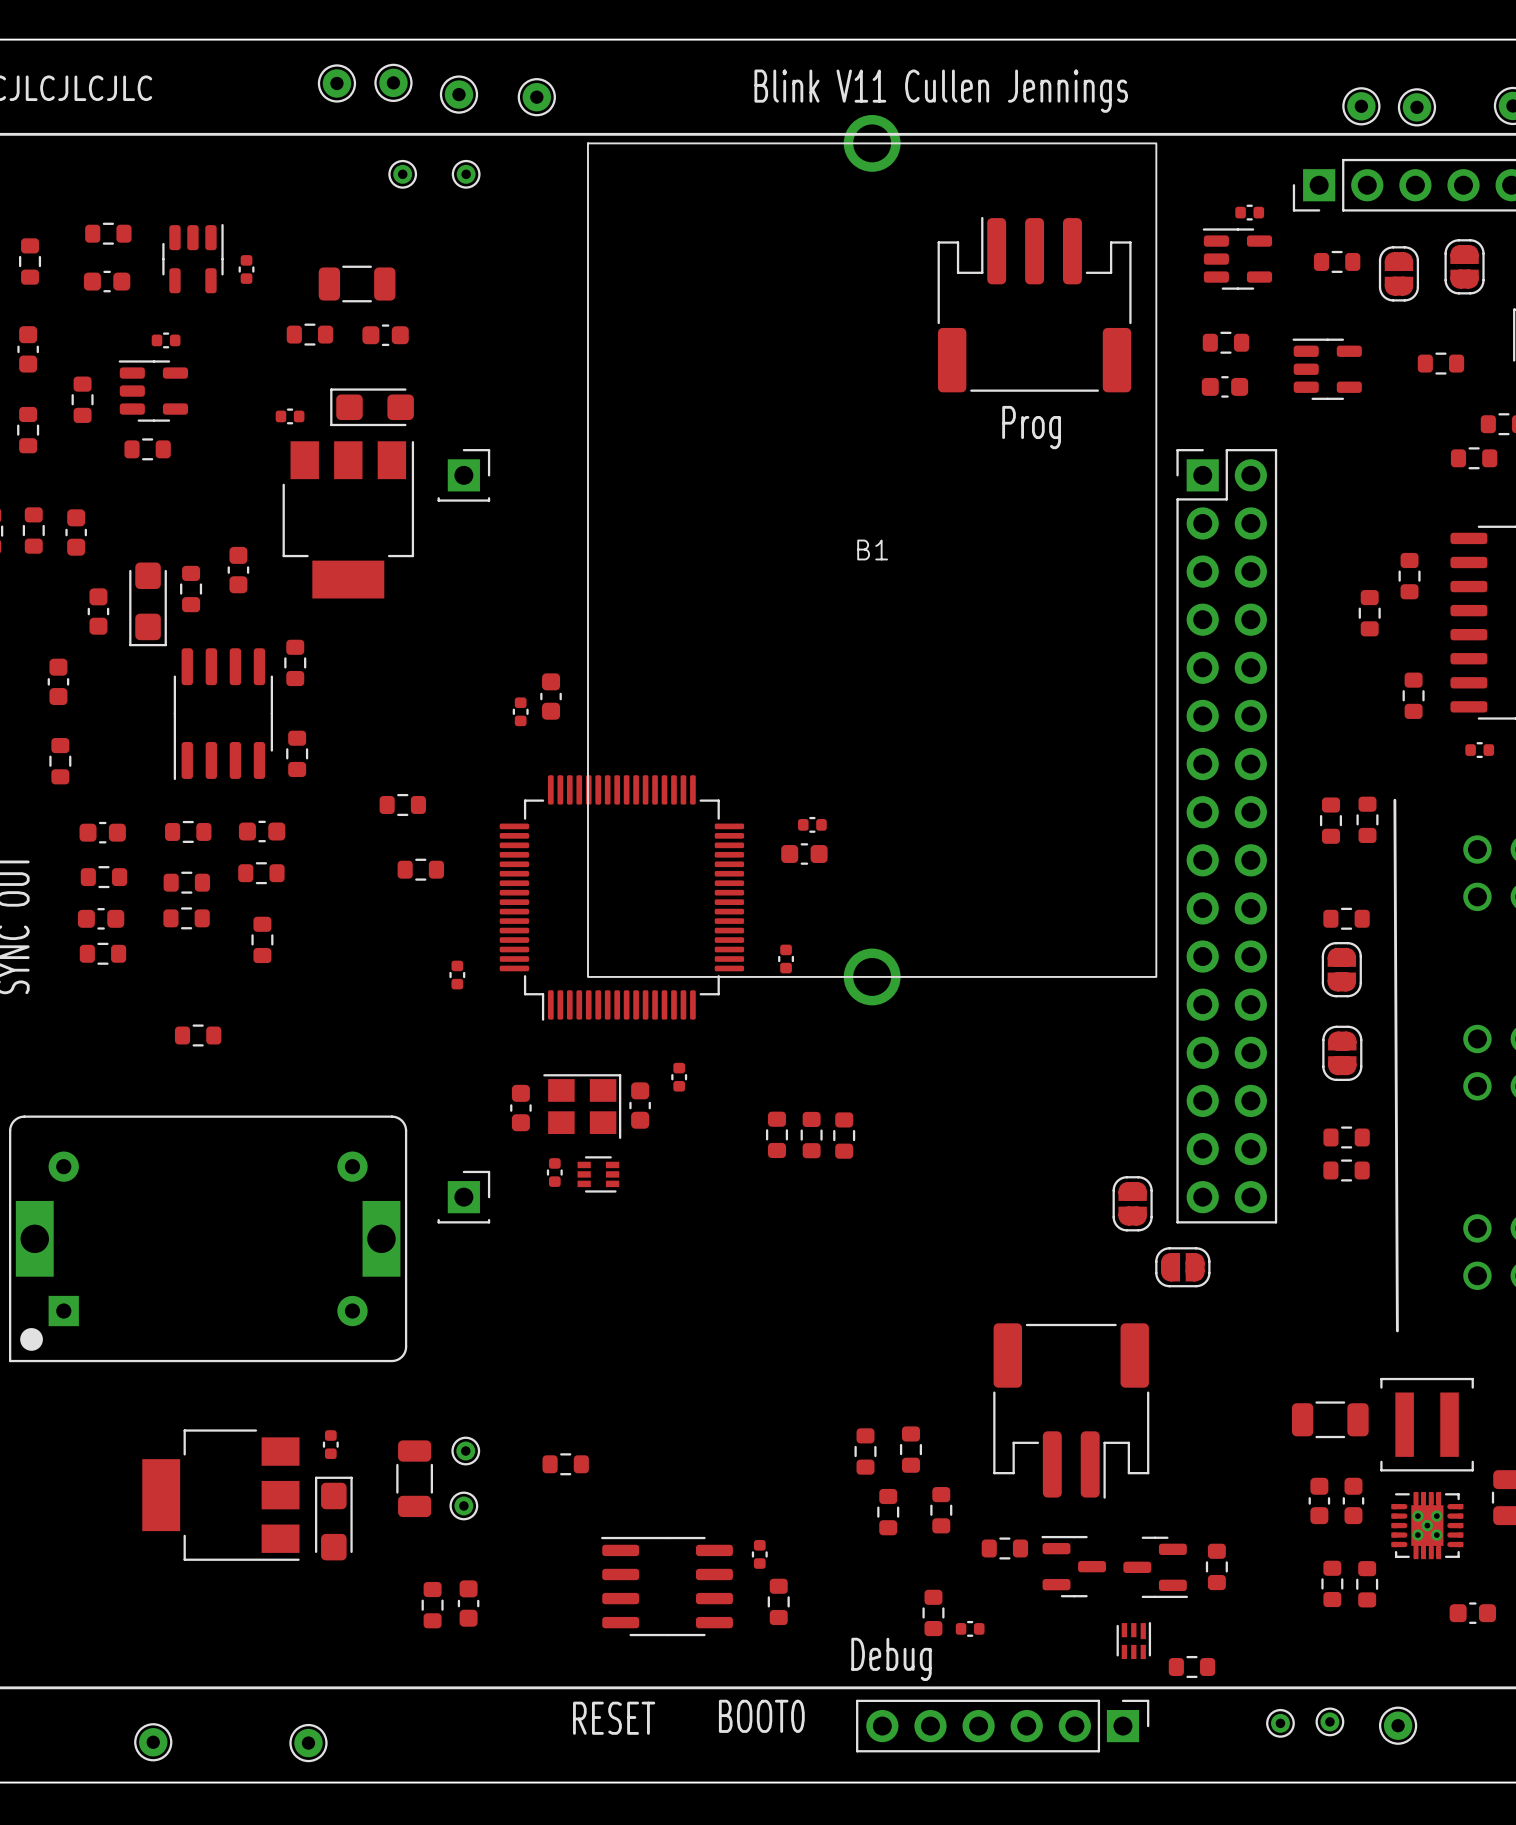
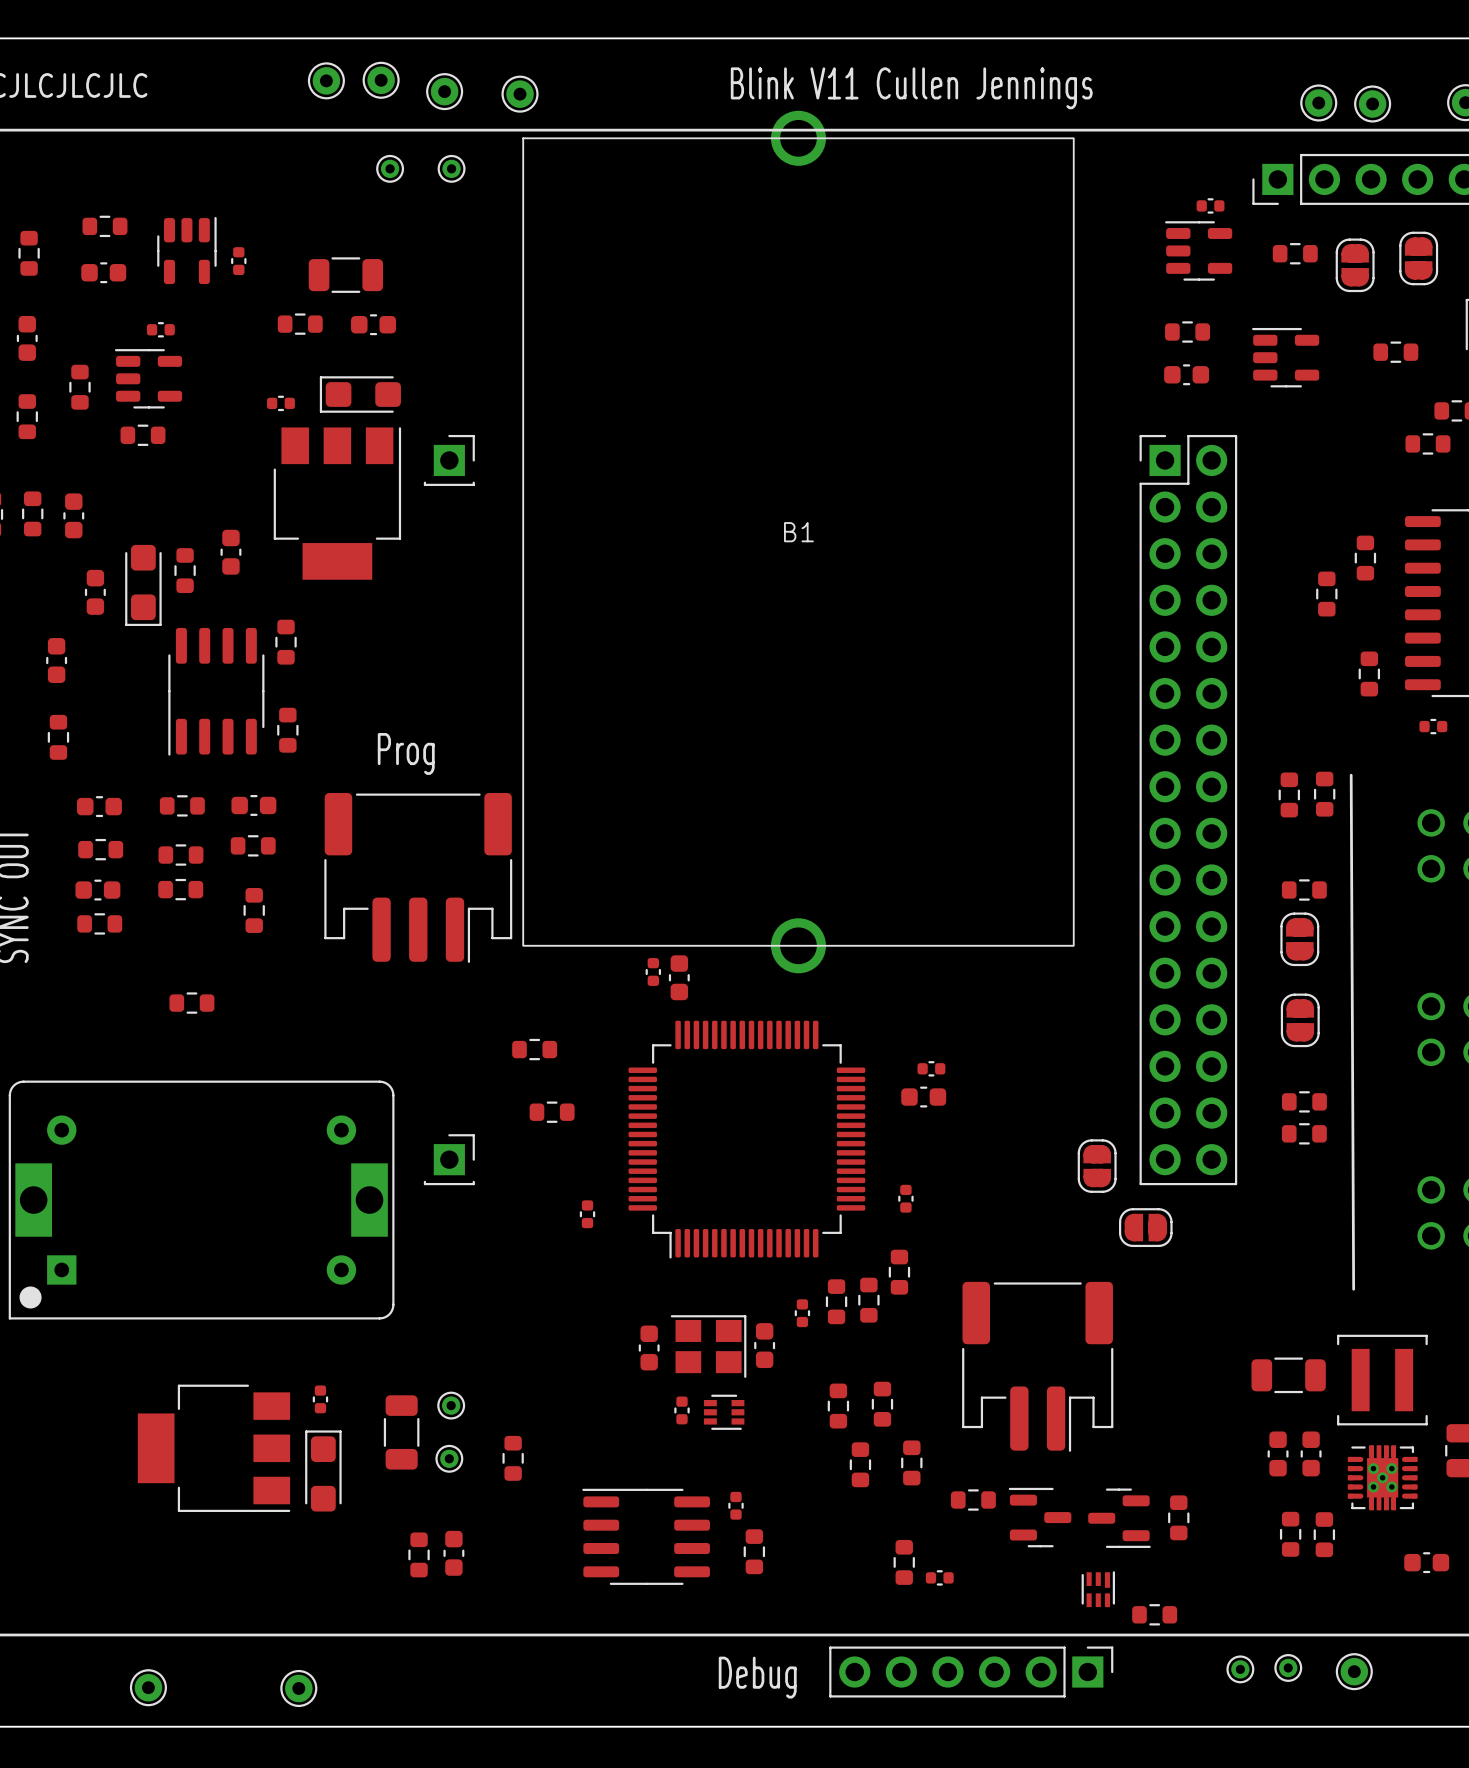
part: (1034, 304) -> none
text: Prog (1031, 427) -> none
B1 position: (872, 560) -> (798, 542)
part: (551, 696) -> none
part: (520, 711) -> none
text: none -> Prog (406, 753)
part: (402, 804) -> none
part: (812, 824) -> none
part: (804, 854) -> none
part: (420, 869) -> none
part position: (621, 897) -> (746, 1139)
part: none -> (418, 877)
part: (786, 958) -> none
part: (457, 975) -> none
part: none -> (653, 971)
part: none -> (679, 977)
part: (679, 1077) -> none
part: none -> (534, 1049)
part: none -> (931, 1068)
part: (640, 1105) -> none
part position: (582, 1106) -> (708, 1346)
part: (520, 1108) -> none
part: none -> (923, 1097)
part: (777, 1134) -> none
part: (811, 1135) -> none
part: (844, 1135) -> none
part: none -> (552, 1112)
part: (554, 1172) -> none
part position: (598, 1174) -> (724, 1412)
part: none -> (905, 1198)
part: none -> (587, 1214)
part: none -> (899, 1272)
part: none -> (868, 1300)
part: none -> (836, 1301)
part: none -> (802, 1313)
part: none -> (764, 1345)
part: none -> (649, 1347)
part: none -> (682, 1410)
part rotation: 0° (565, 1464) -> 90° clockwise (513, 1458)
part position: (565, 1464) -> (513, 1458)
text position: Debug (891, 1659) -> Debug (757, 1677)
text: BOOT0 (761, 1716) -> none
text: RESET (614, 1718) -> none

